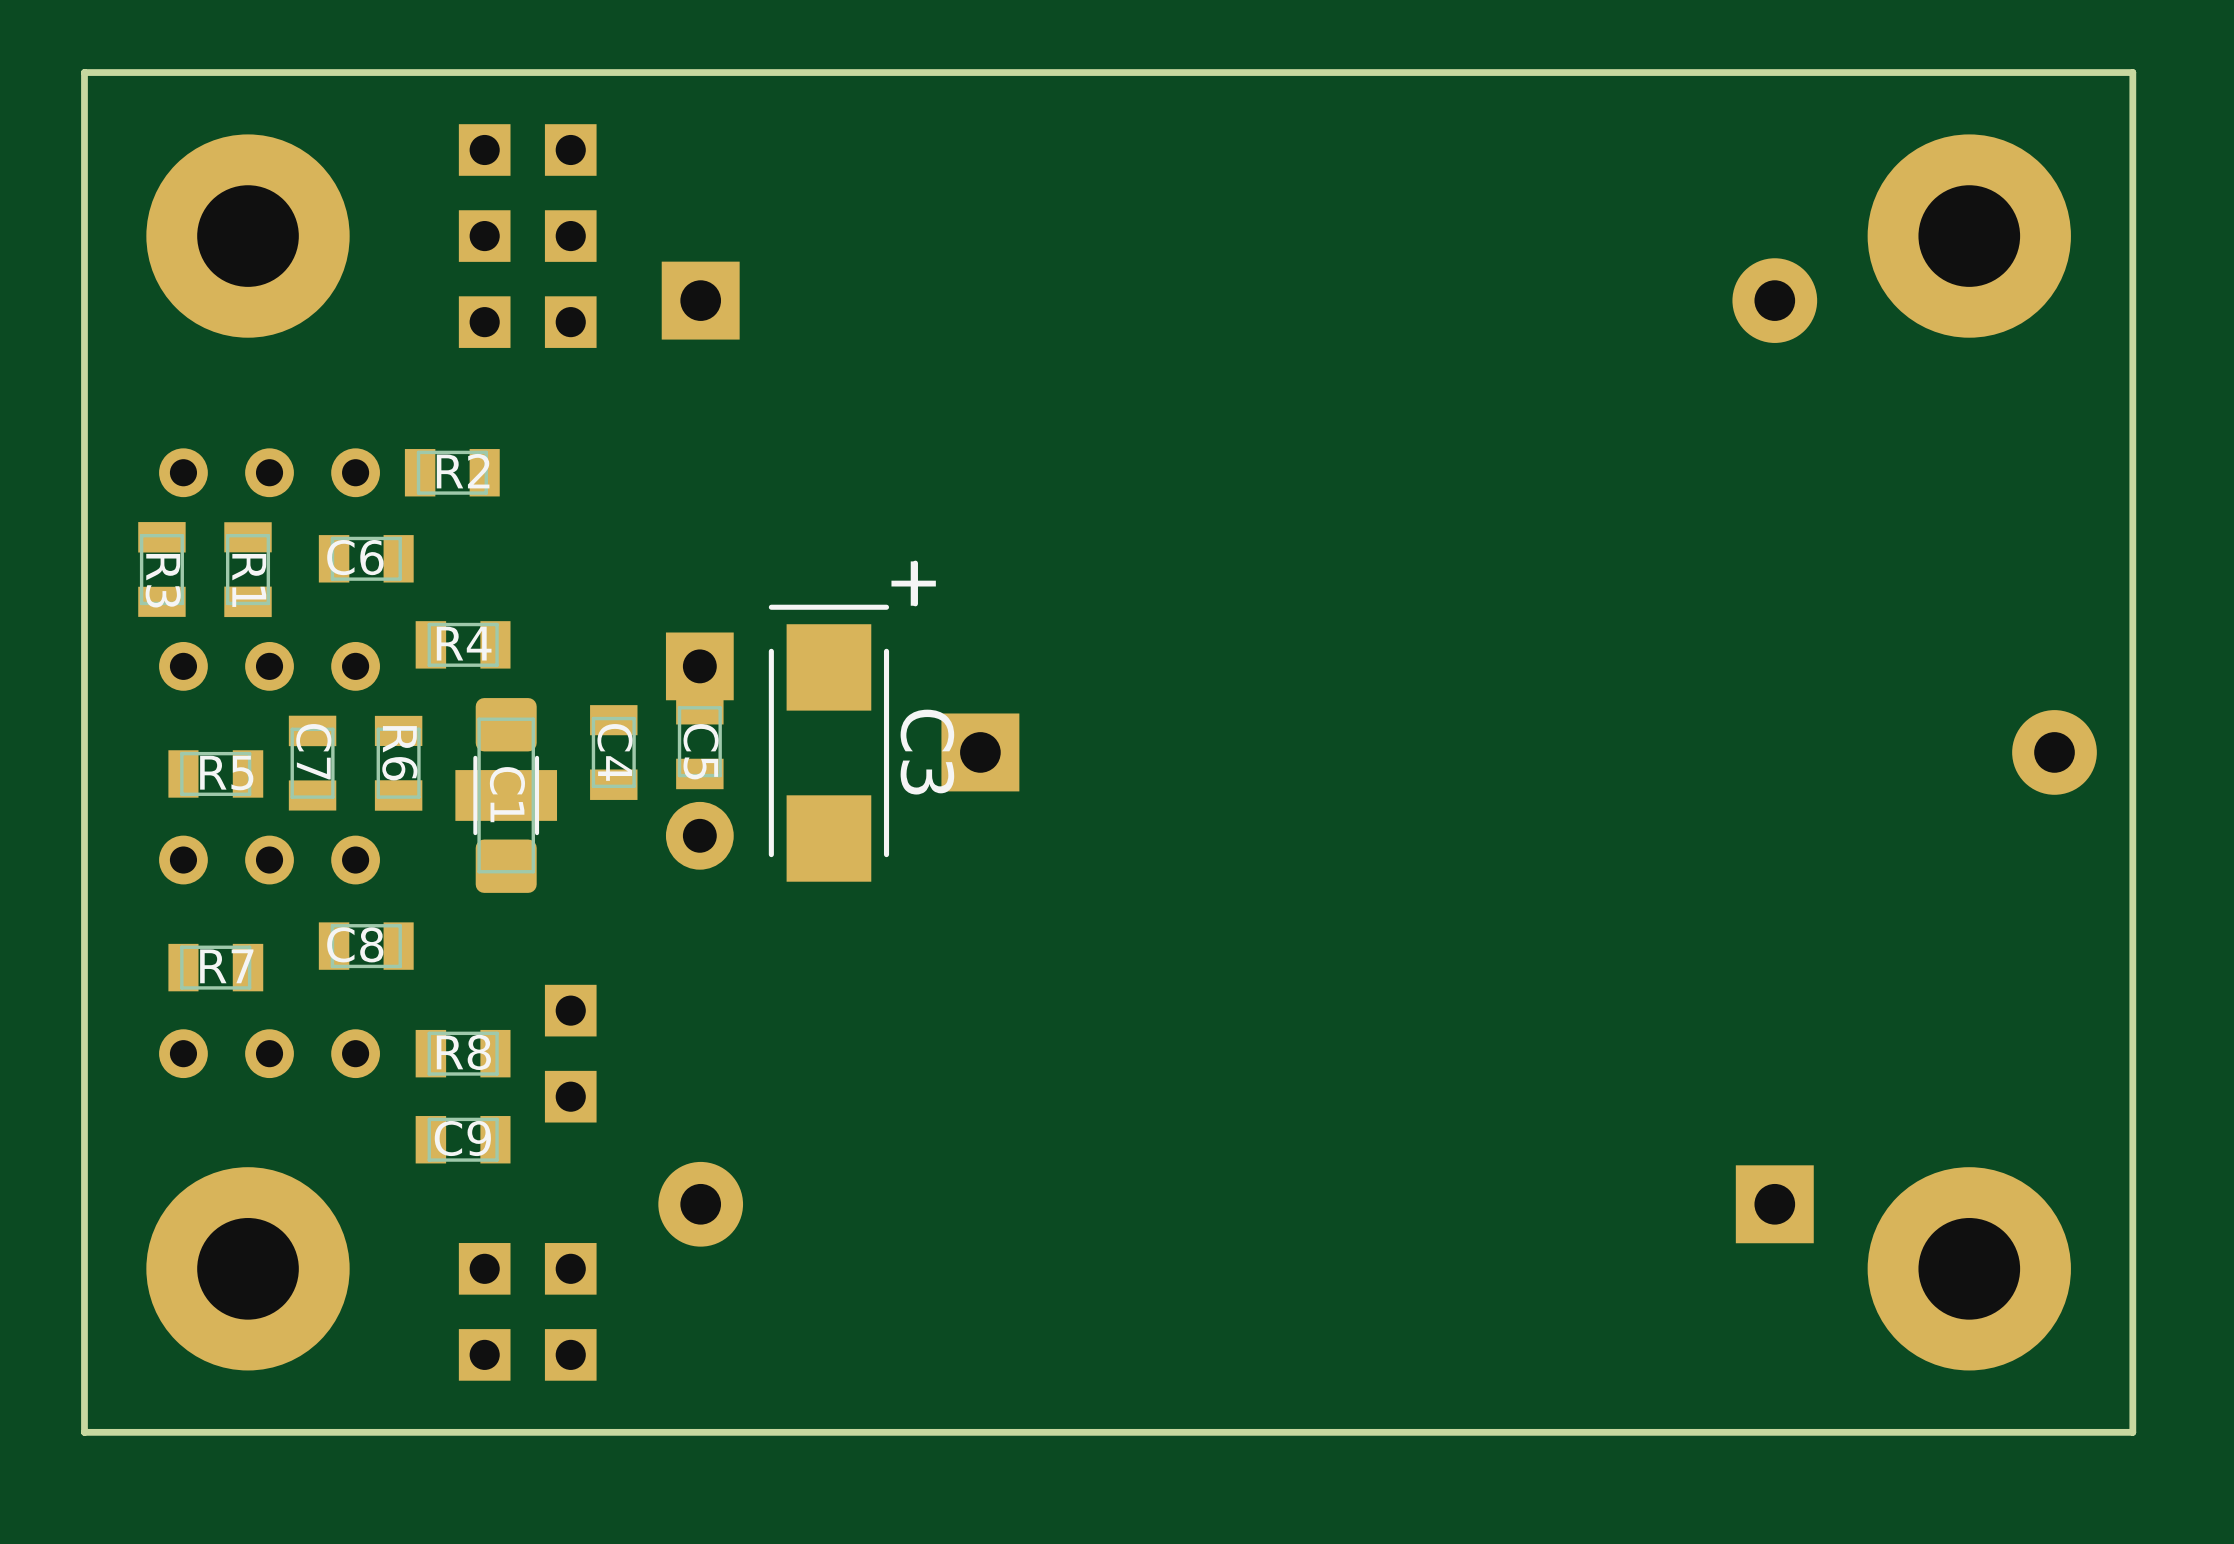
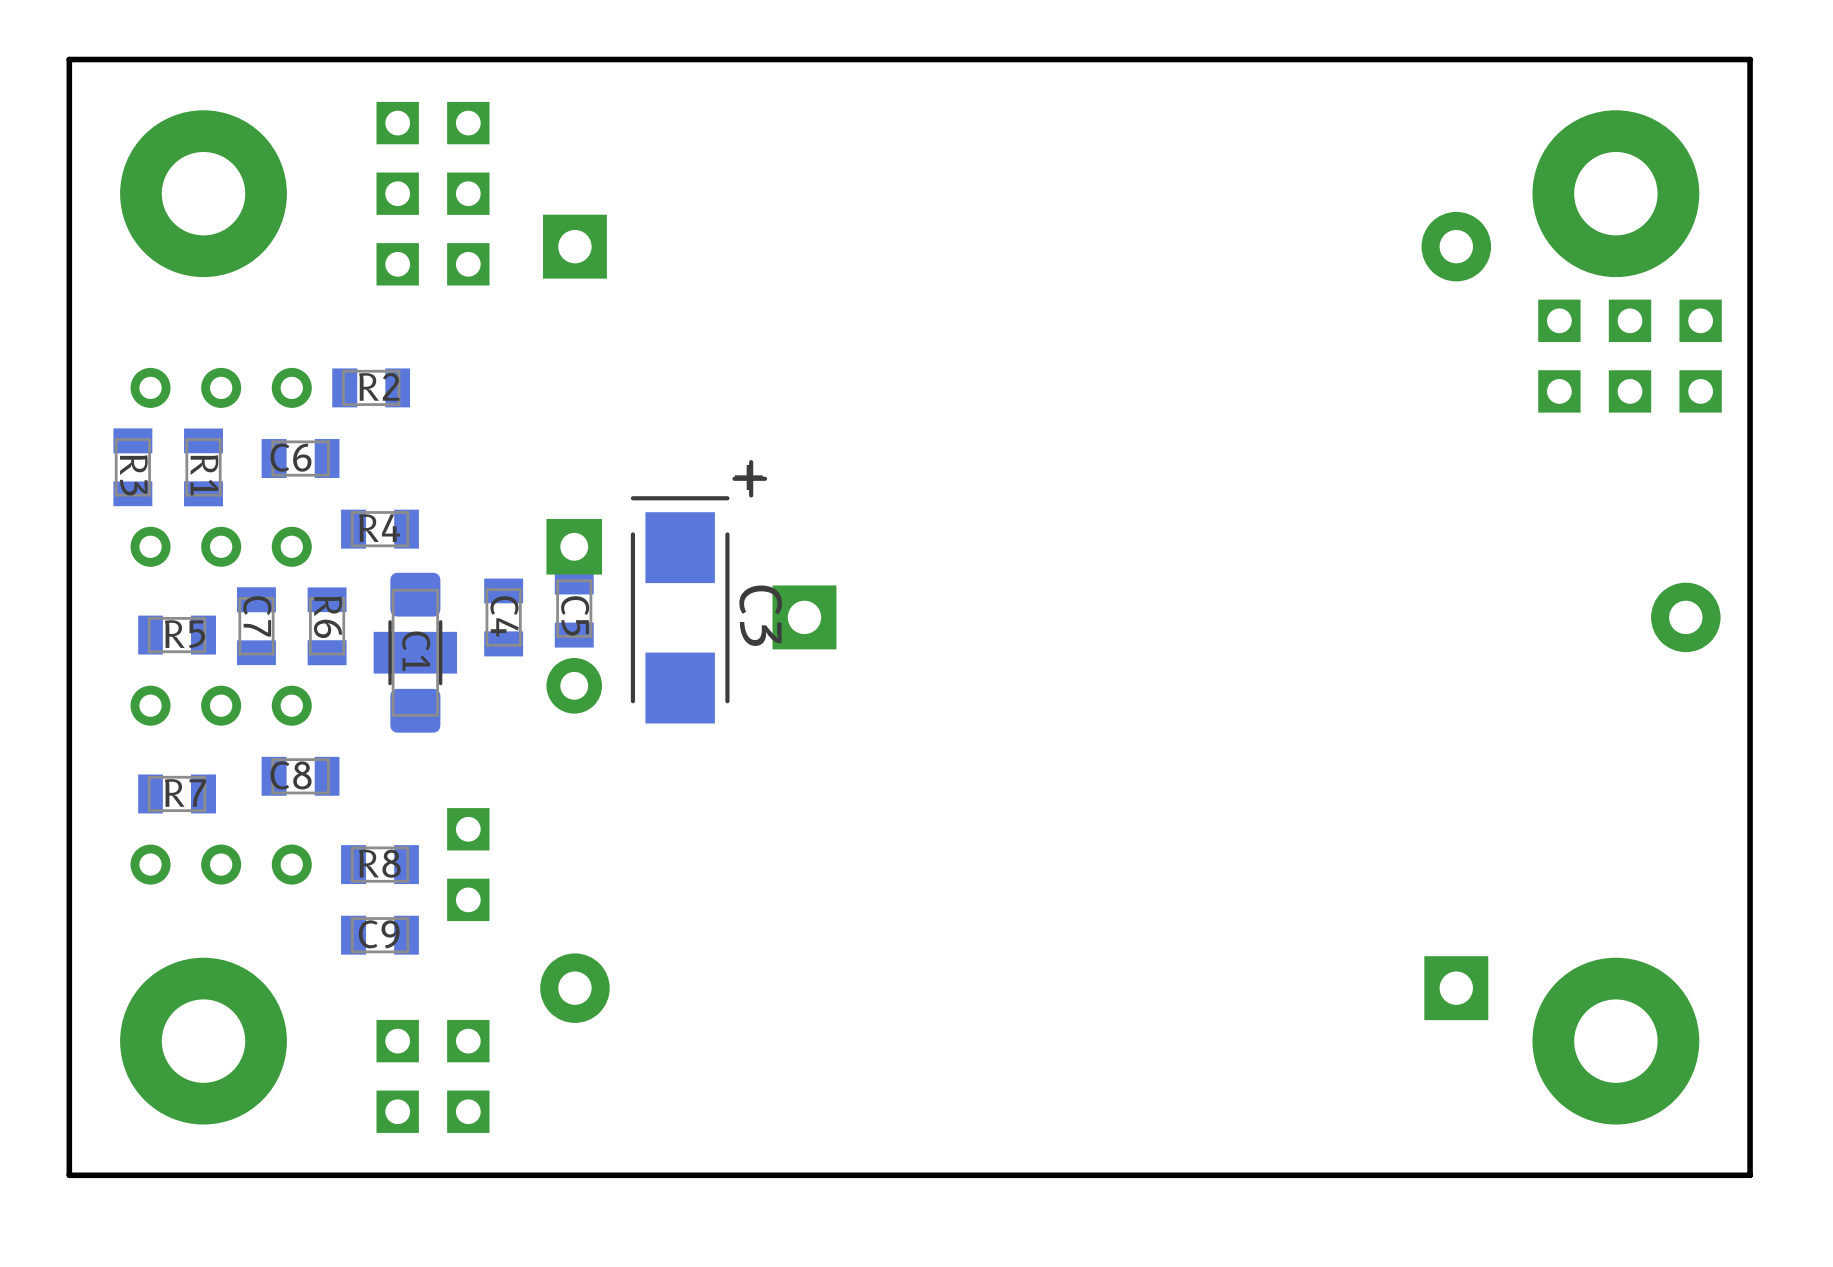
part: none -> (1559, 356)
part: none -> (1630, 356)
part: none -> (1700, 356)

